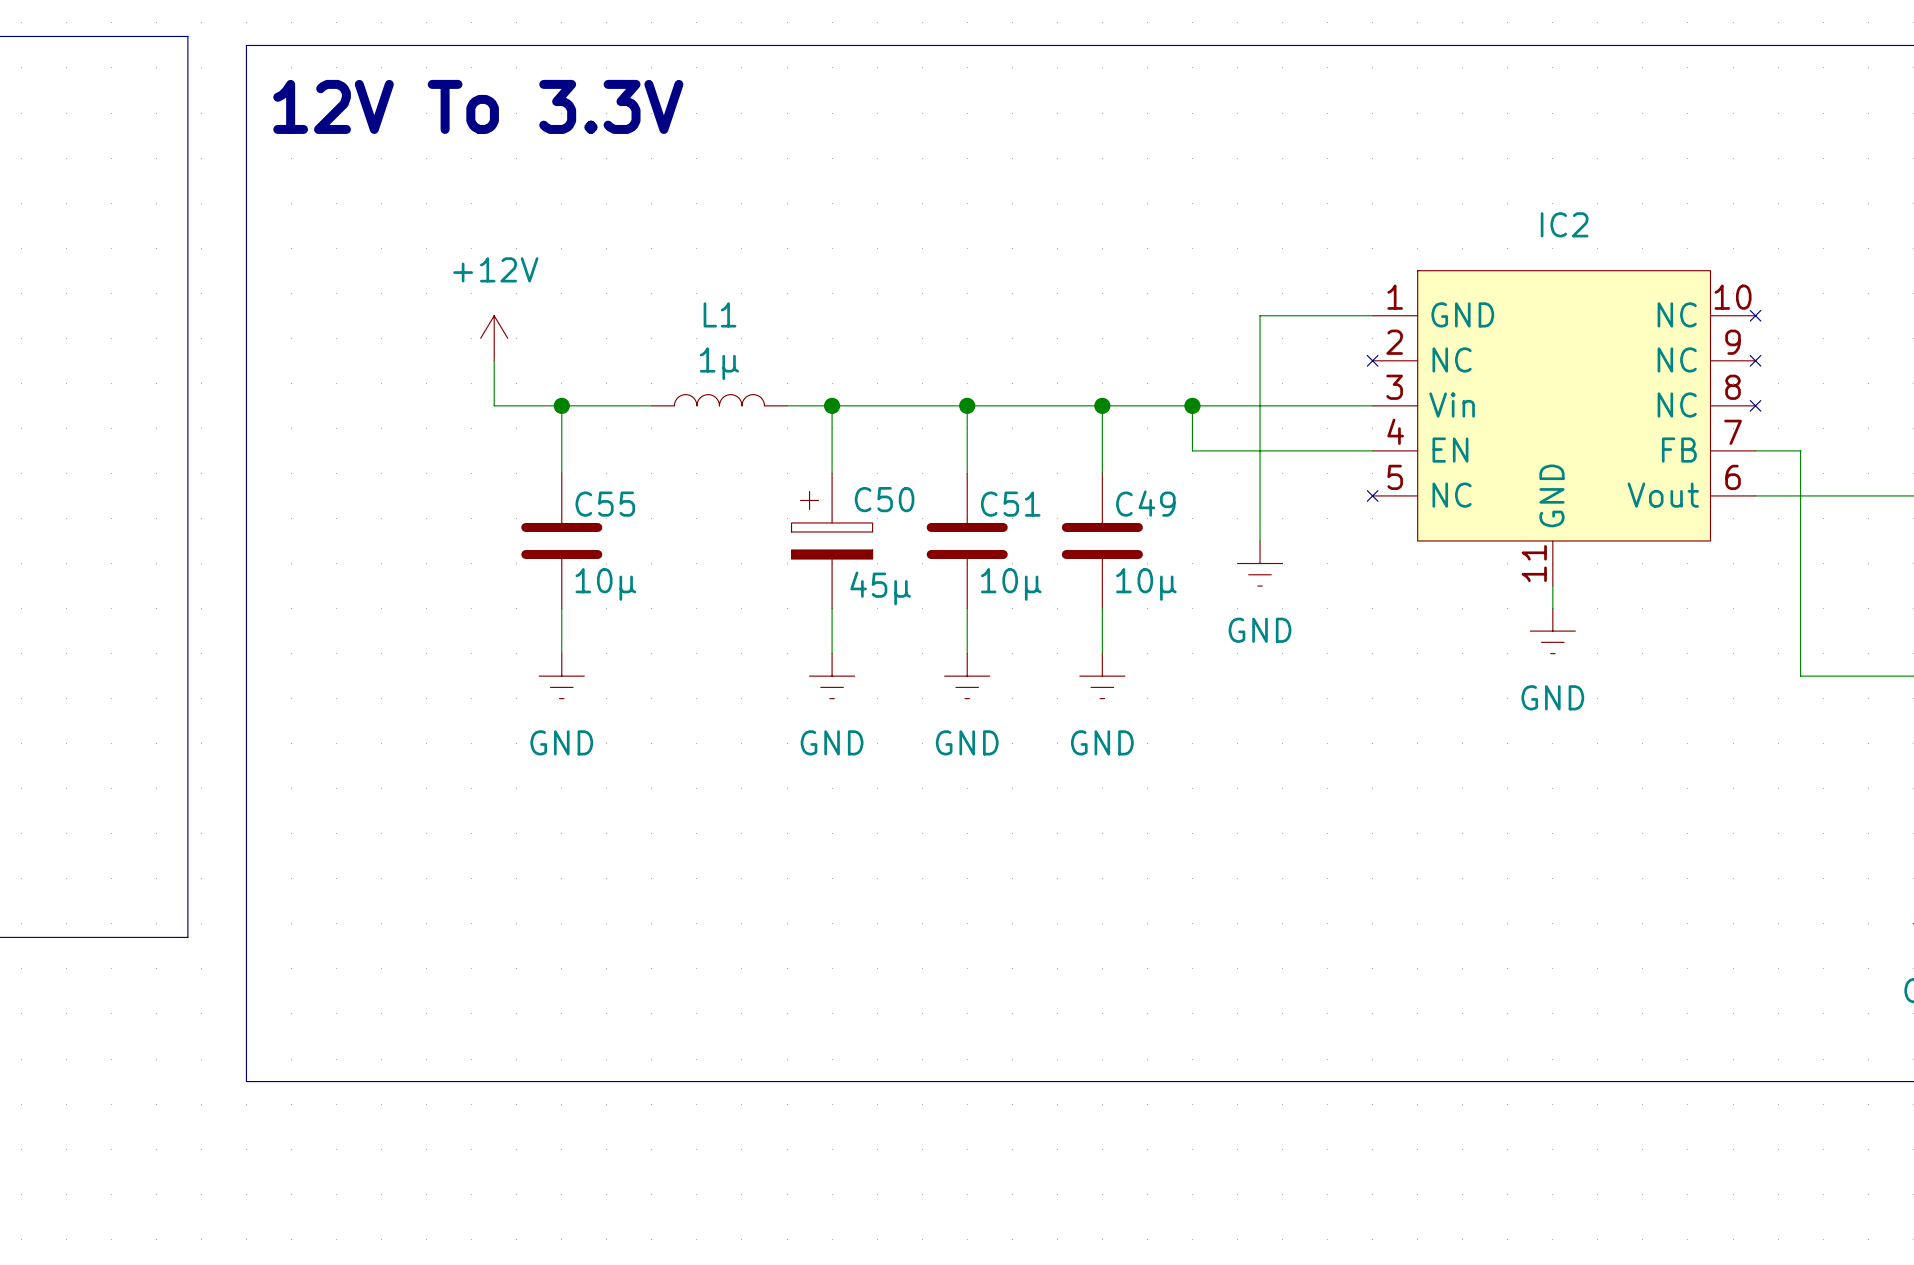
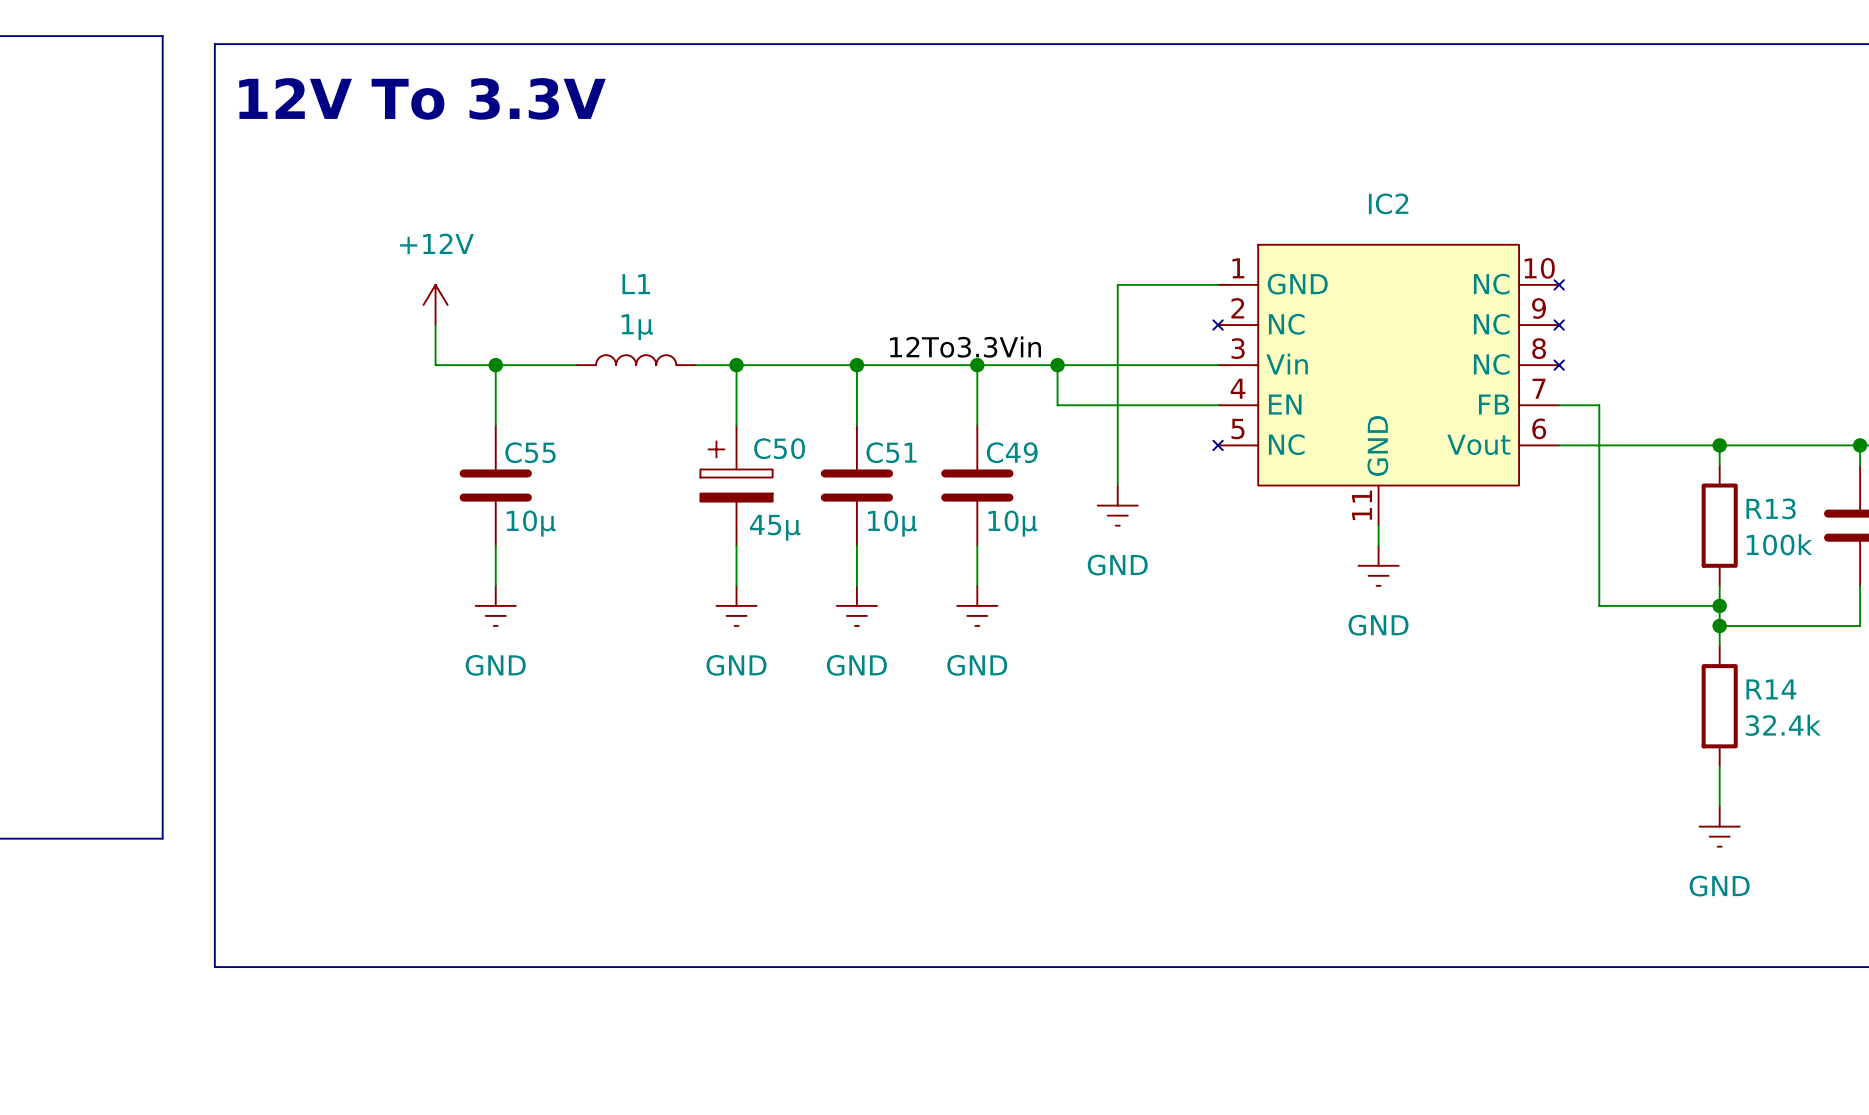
label: none -> 12To3.3Vin (965, 347)

